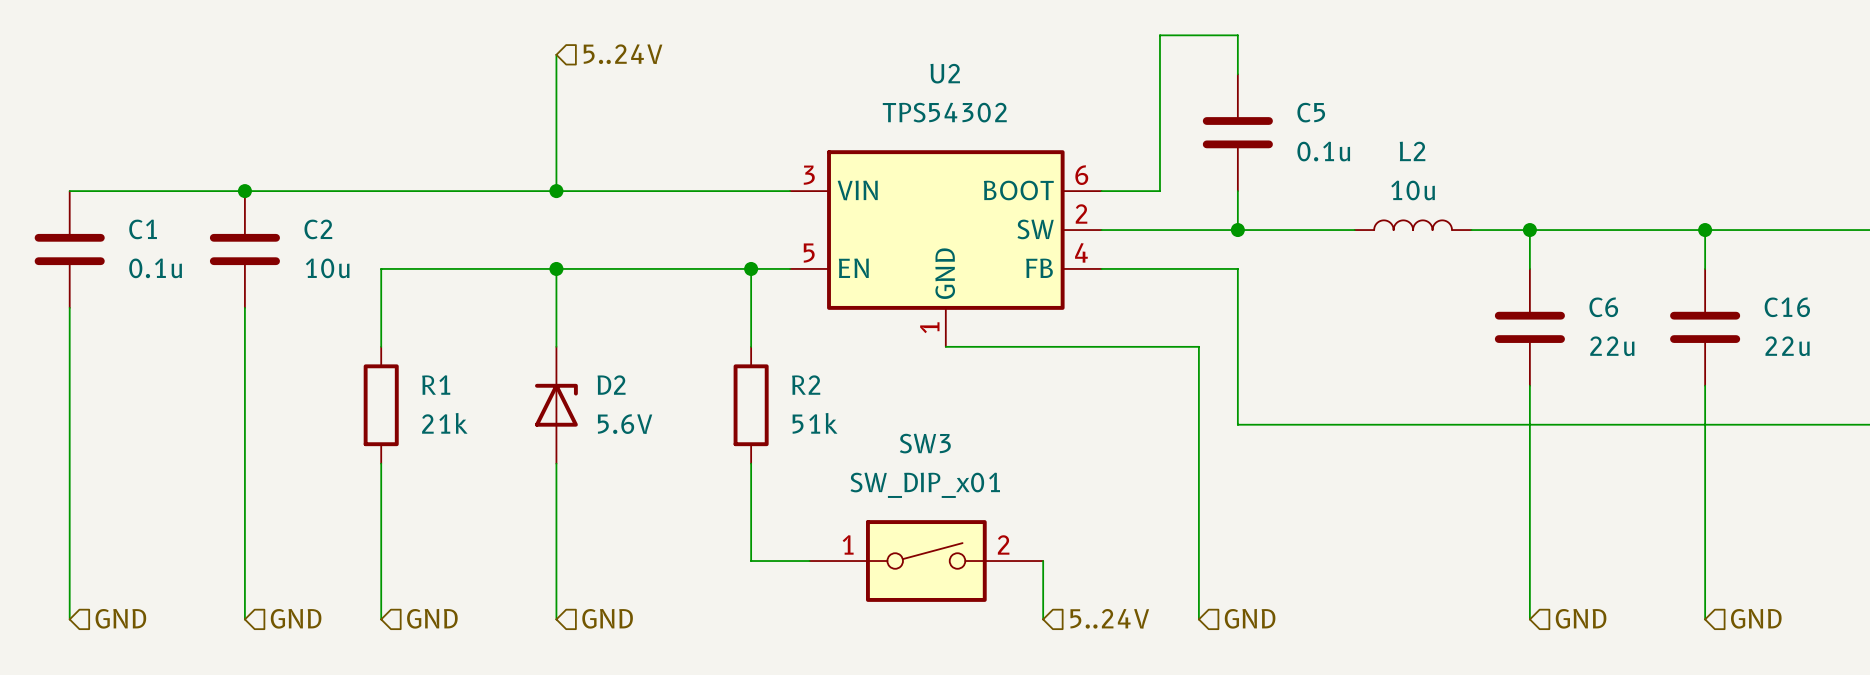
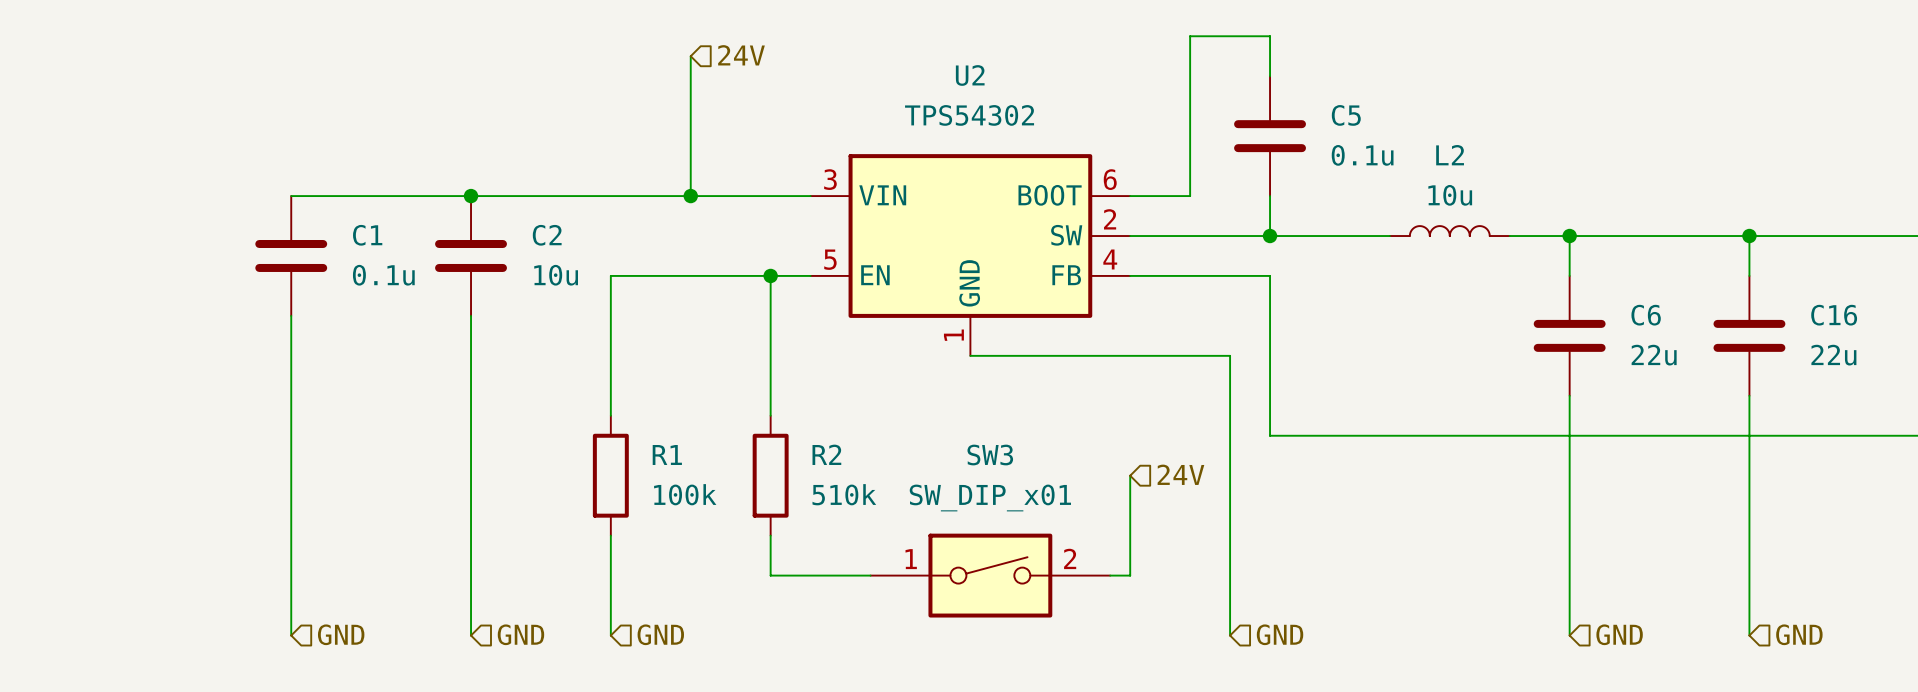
wire: (556, 54) (556, 191) -> (690, 56) (690, 196)
hierarchical label: 5..24V (623, 54) -> 24V (741, 55)
wire: (69, 191) (283, 191) -> none
junction: (244, 191) -> none
junction: none -> (471, 196)
junction: (556, 191) -> none
junction: none -> (690, 196)
C1 position: (69, 249) -> (291, 255)
C2 position: (244, 249) -> (471, 255)
wire: (556, 268) (556, 346) -> none
junction: (556, 268) -> none
wire: (595, 268) (381, 268) (381, 346) -> (610, 275) (610, 415)
wire: (69, 307) (69, 619) -> (291, 315) (291, 635)
wire: (244, 307) (244, 619) -> (471, 315) (471, 635)
R1 position: (381, 405) -> (610, 475)
D2: 5.6V (556, 405) -> none
R2 position: (751, 405) -> (770, 475)
R1 value: 21k (444, 423) -> 100k (685, 494)
R2 value: 51k (815, 423) -> 510k (844, 494)
wire: (381, 463) (381, 619) -> none
wire: (556, 463) (556, 619) -> none
wire: (751, 463) (751, 522) -> (770, 355) (770, 415)
wire: none -> (1130, 475) (1130, 575) (1110, 575)
hierarchical label: none -> 24V (1180, 474)
wire: none -> (610, 535) (610, 635)
SW3 position: (926, 561) -> (990, 575)
wire: (1043, 561) (1043, 619) -> none
hierarchical label: GND (120, 618) -> none
hierarchical label position: GND (296, 618) -> GND (341, 634)
hierarchical label: GND (432, 618) -> none
hierarchical label: none -> GND (520, 634)
hierarchical label position: GND (607, 618) -> GND (660, 634)
hierarchical label: 5..24V (1109, 618) -> none

